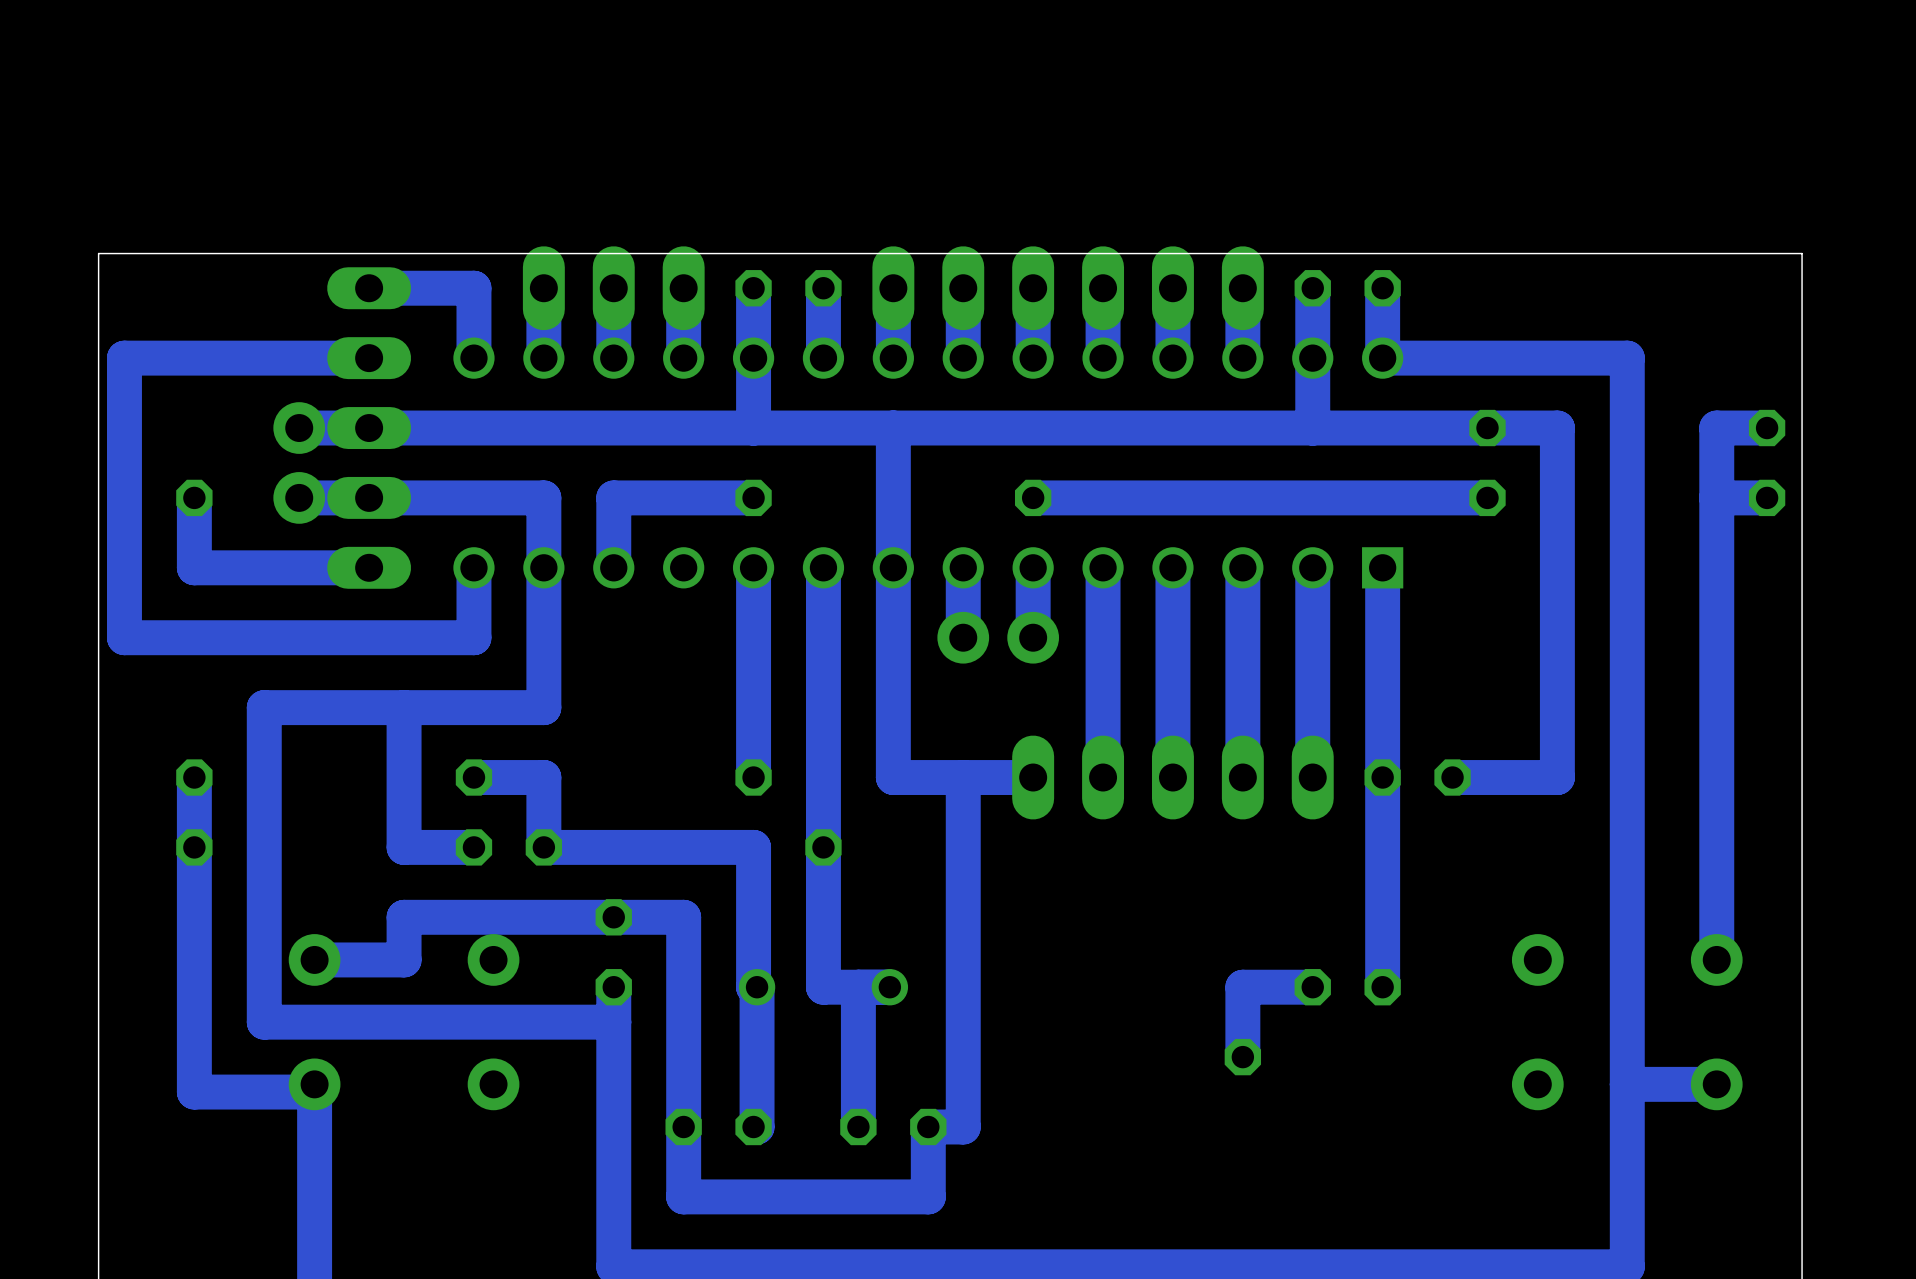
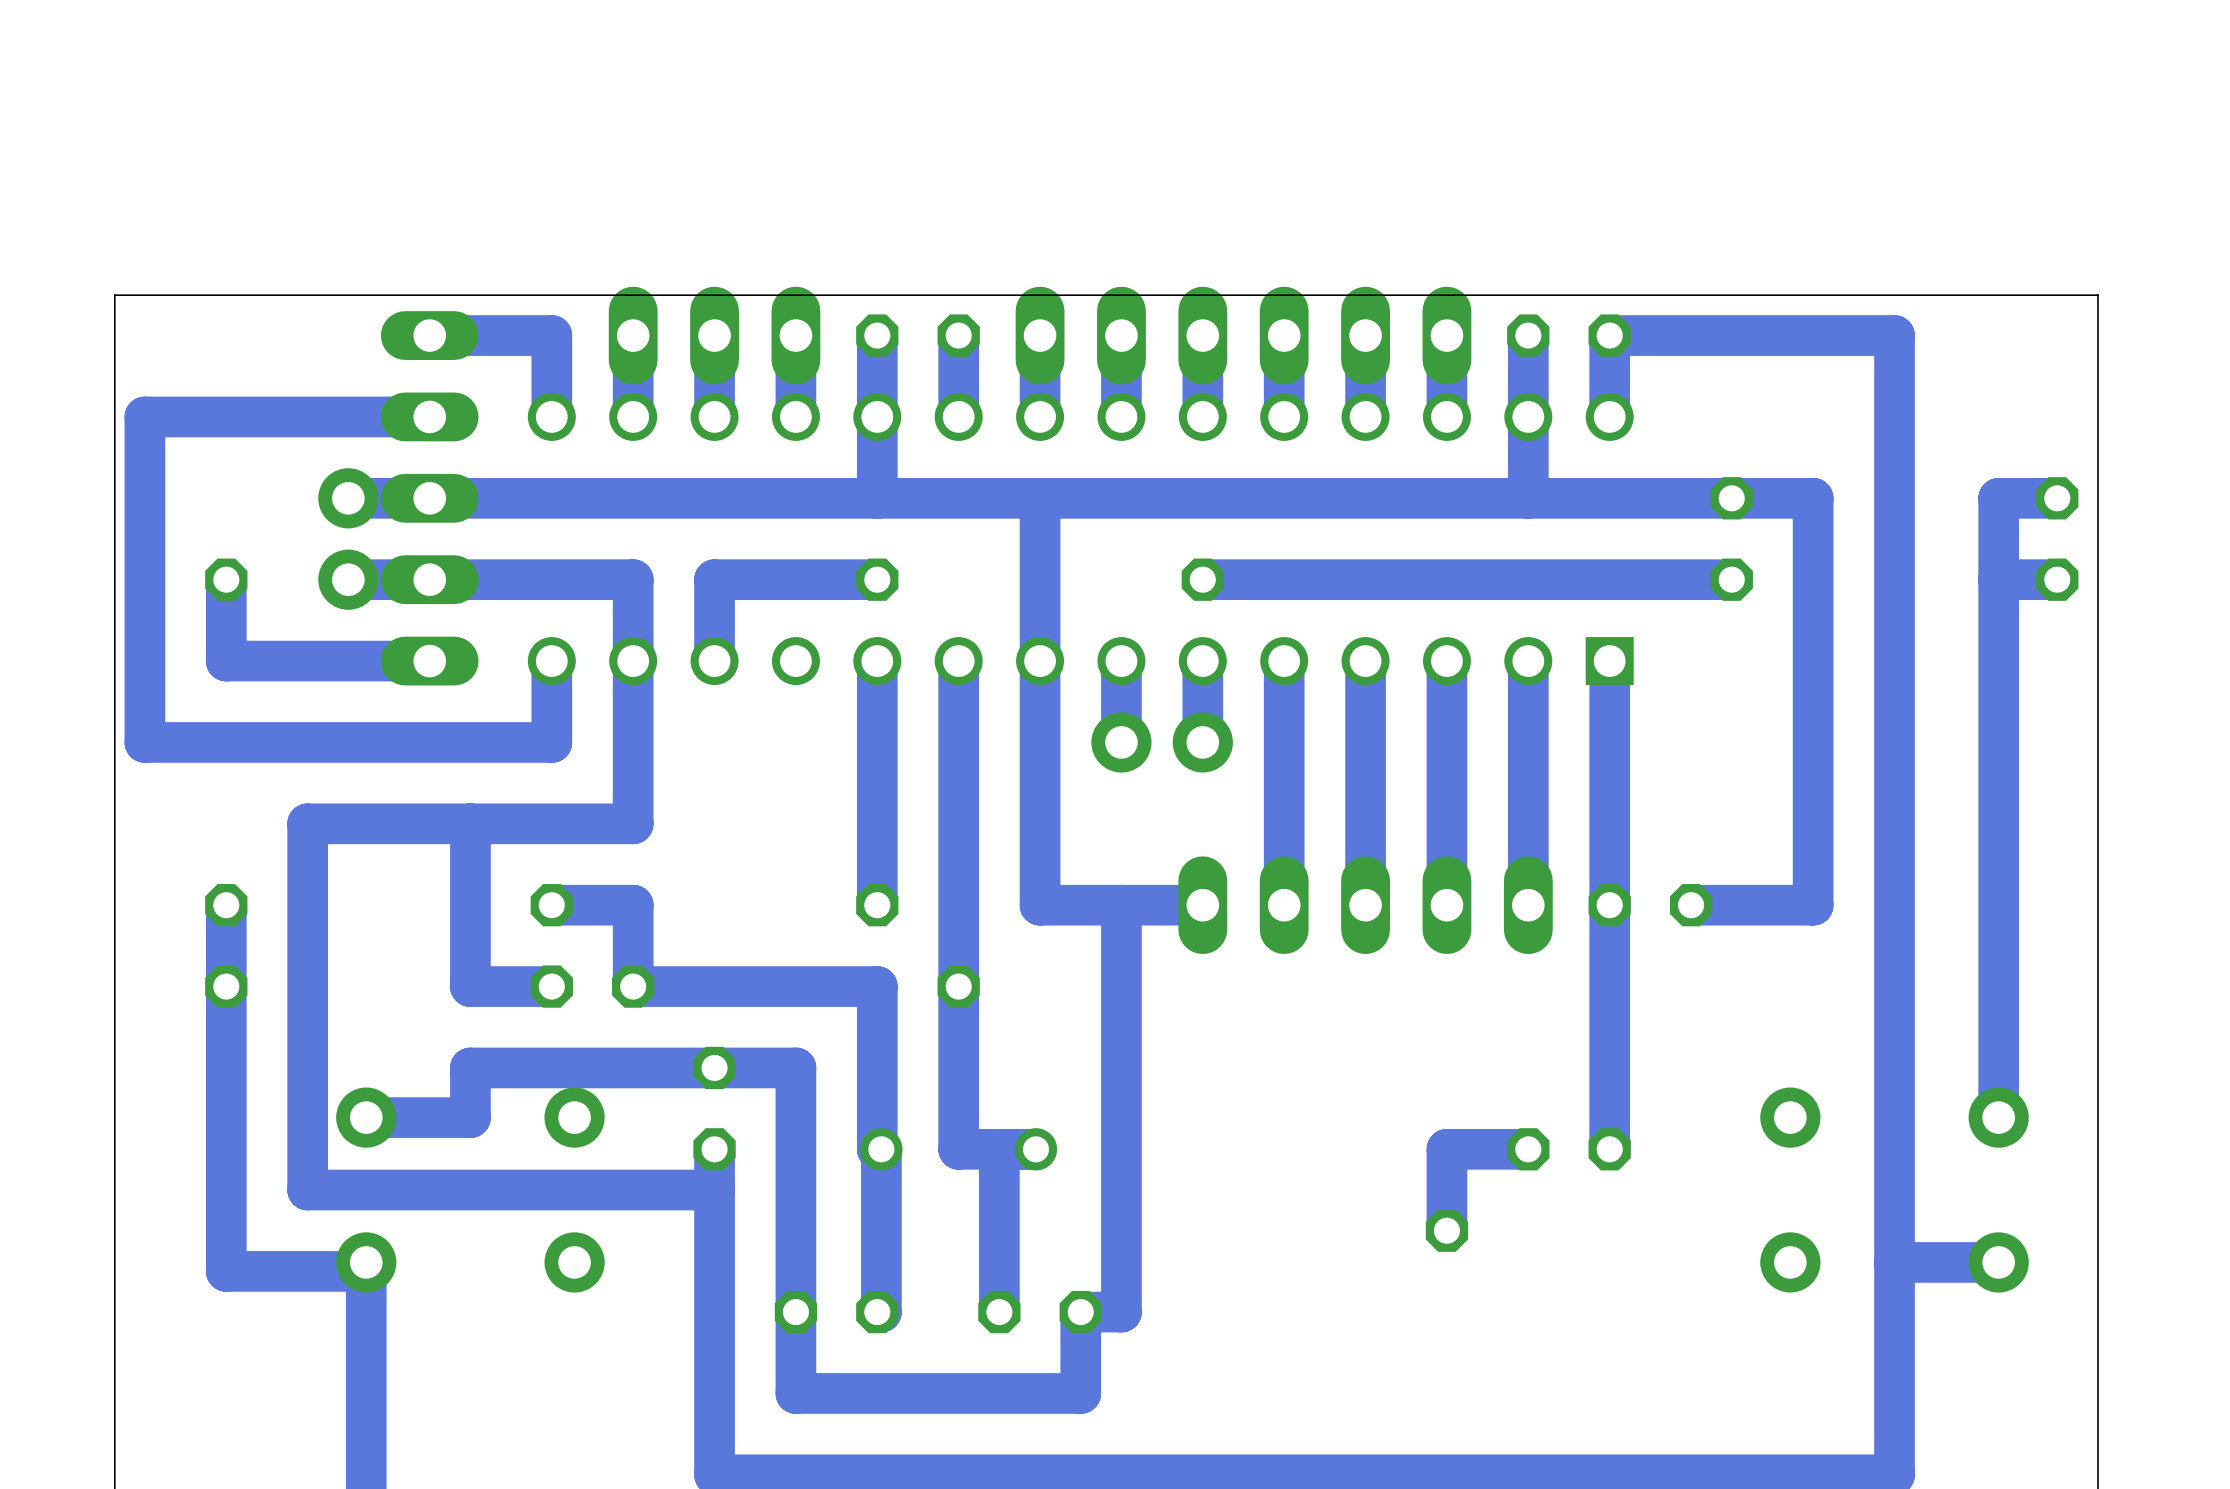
track: (1627, 358) (1382, 358) -> (1894, 416) (1894, 335) (1609, 335)

